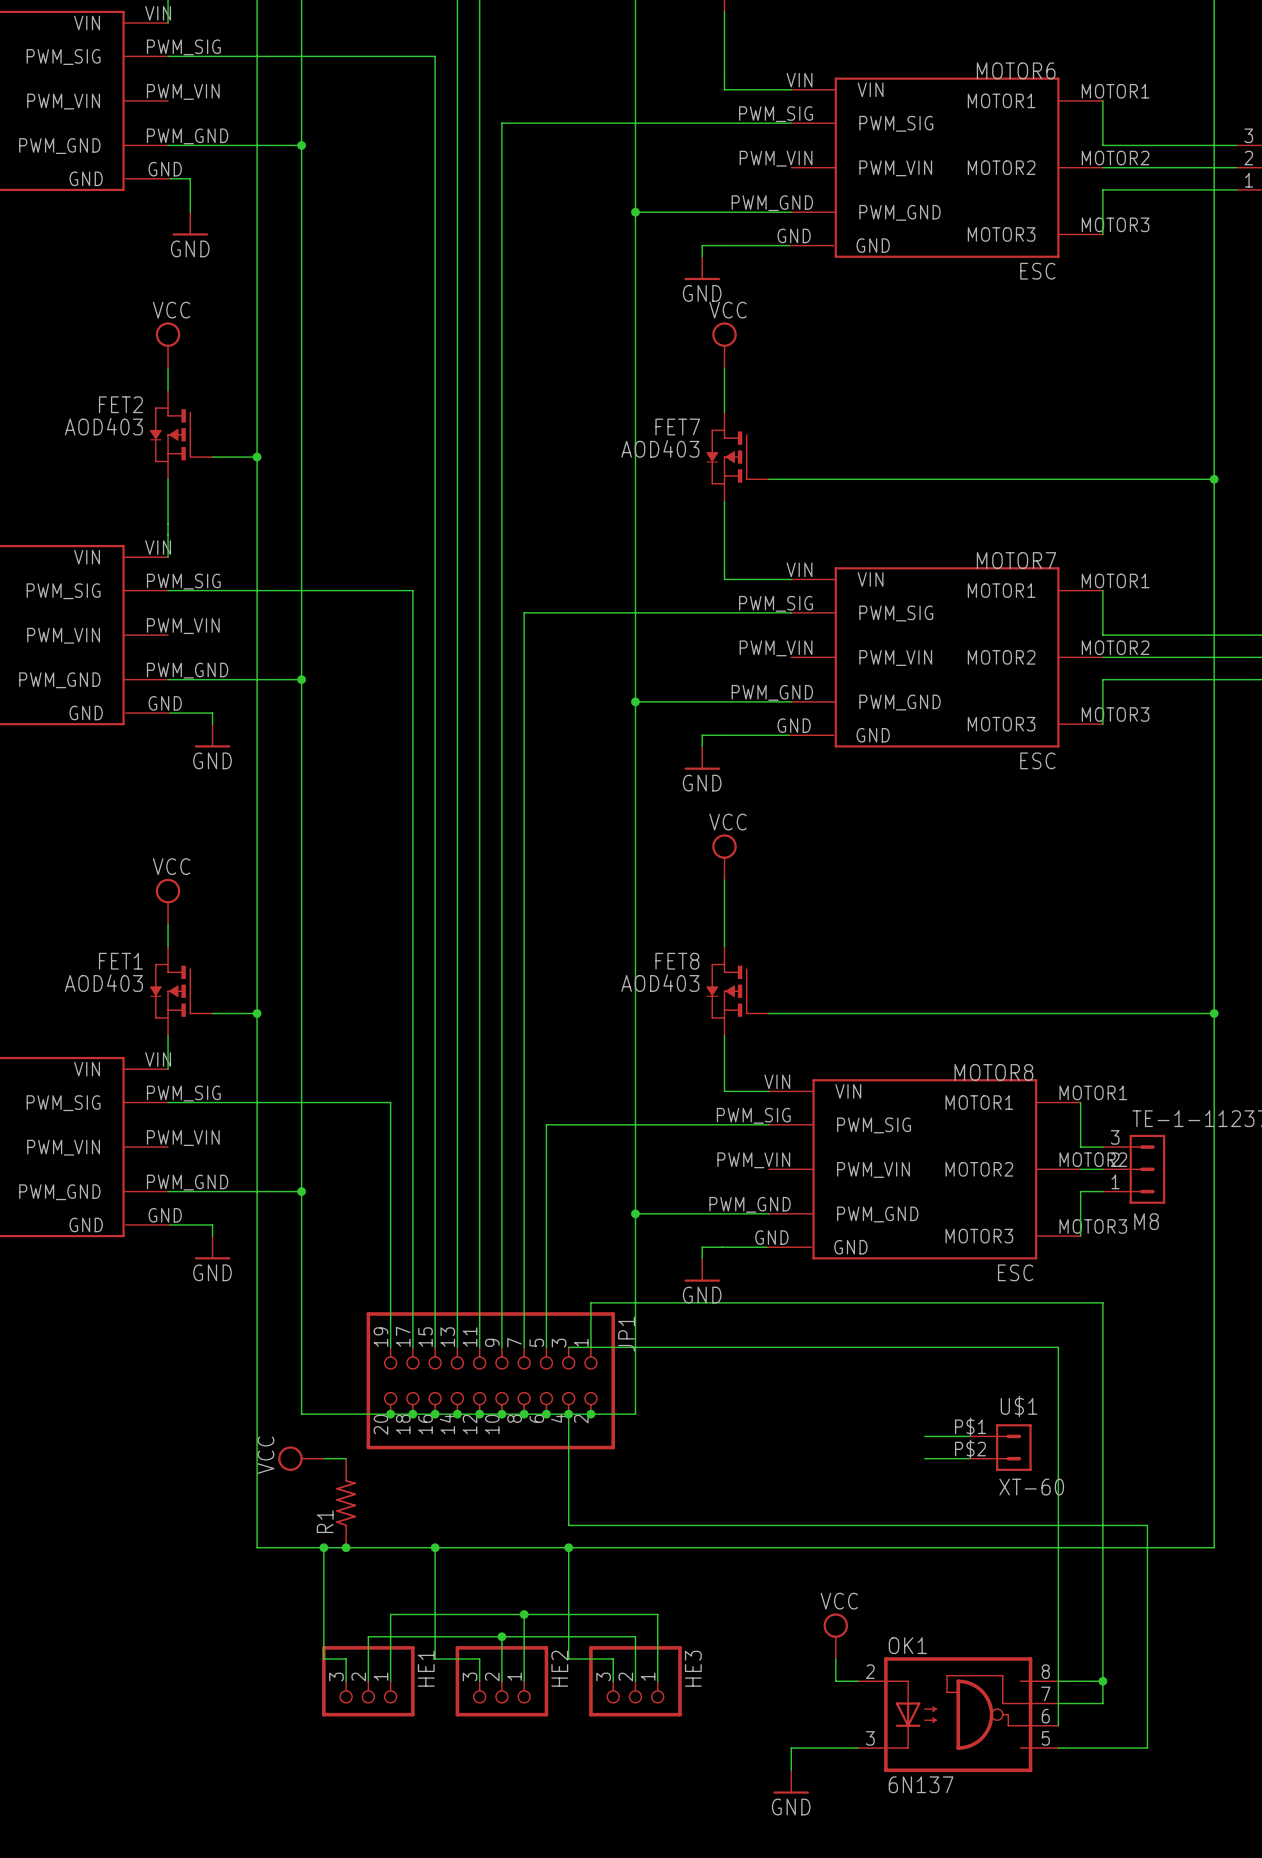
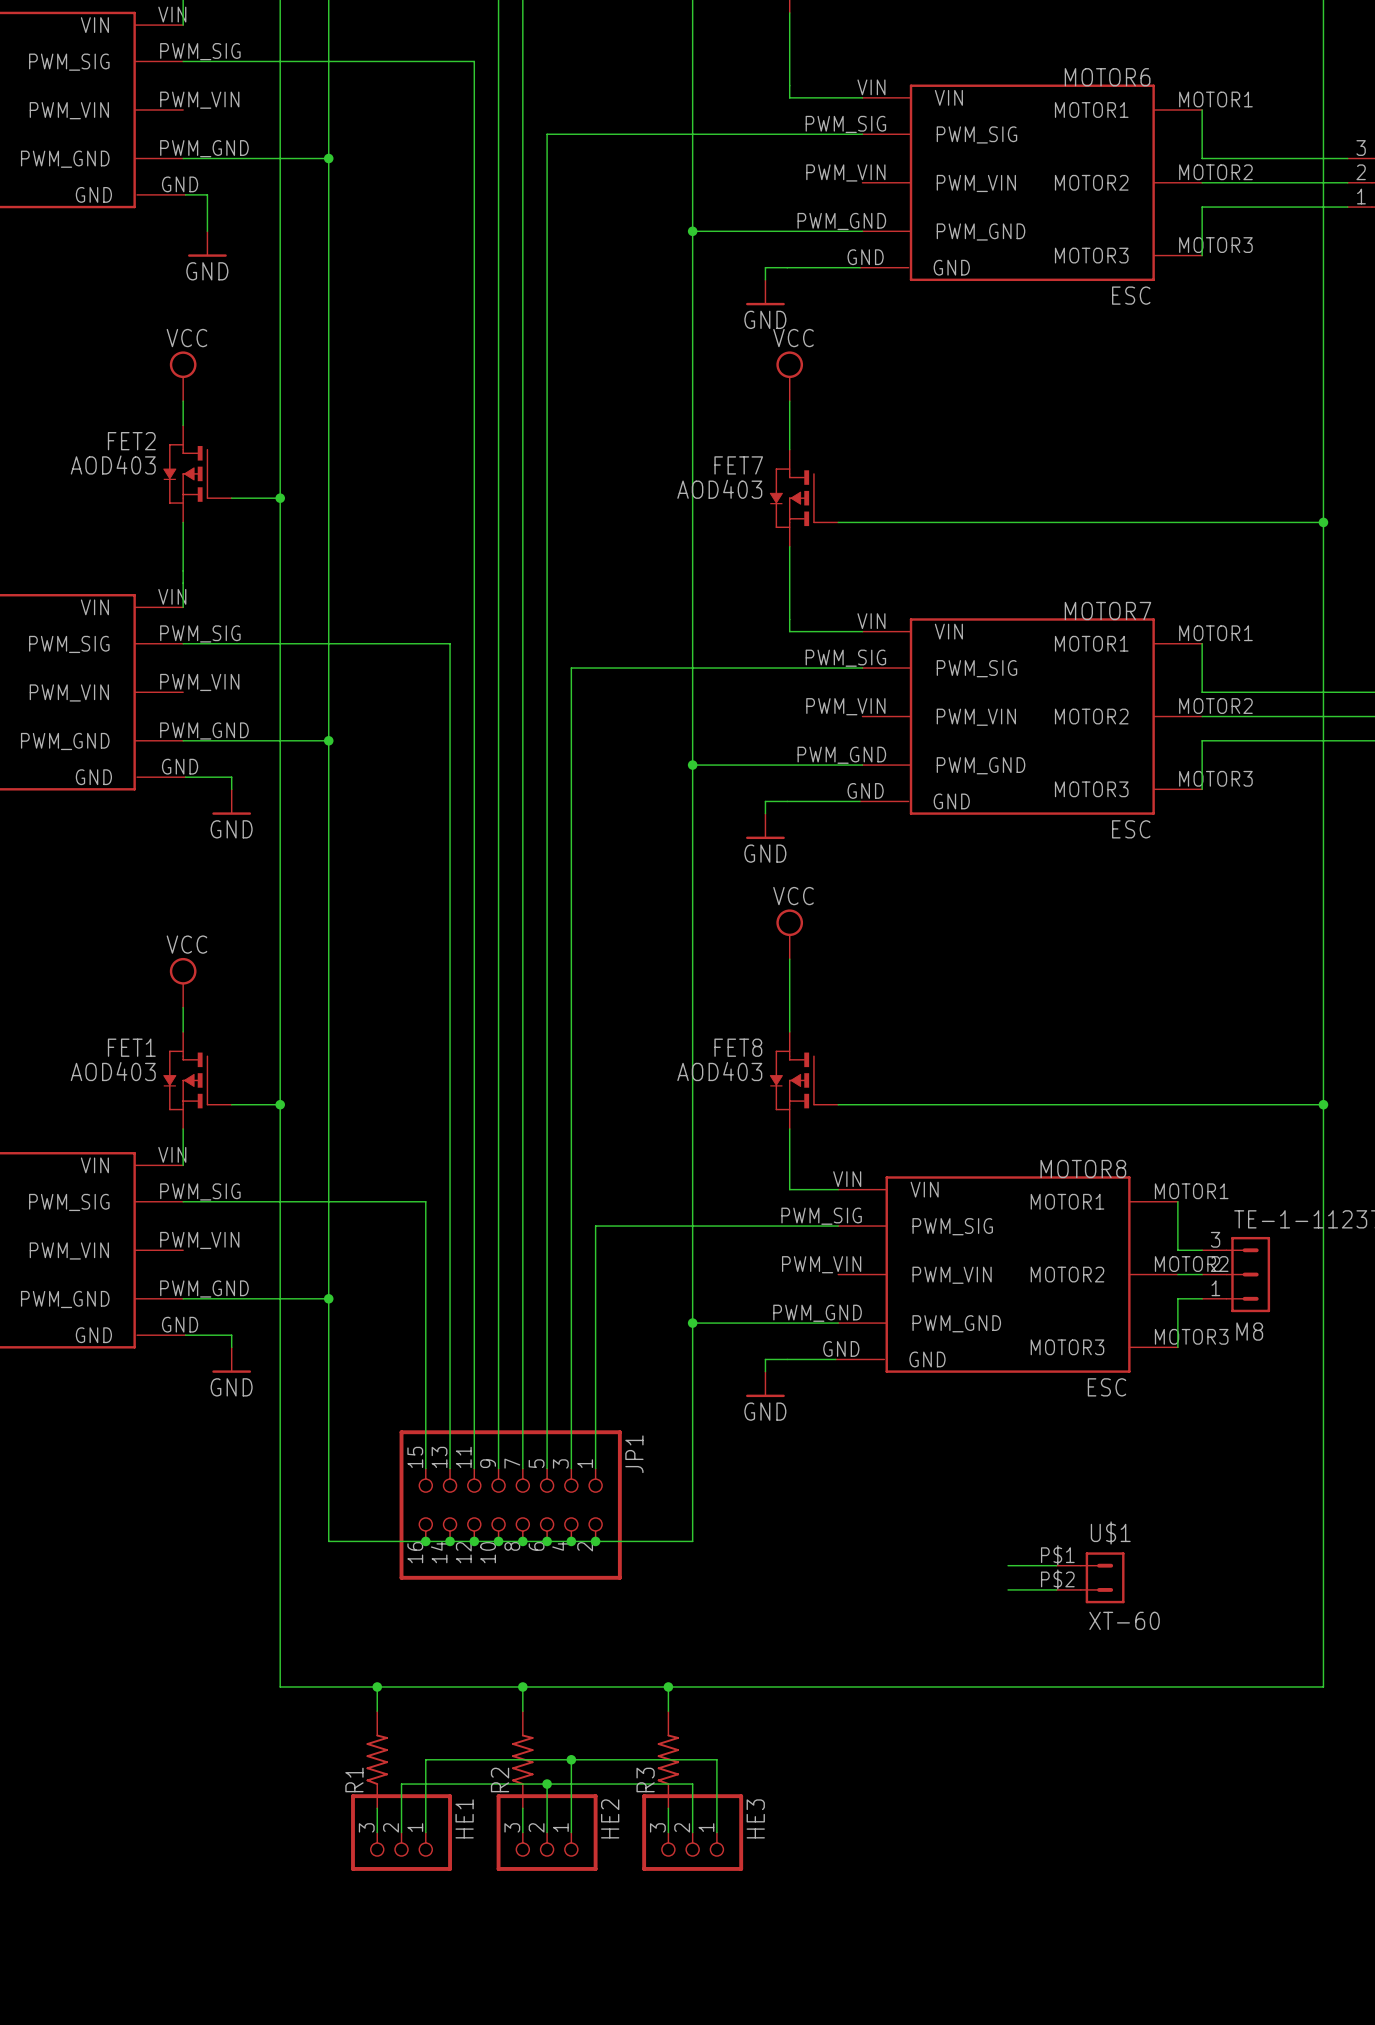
JP1 symbol: [366, 1312, 615, 1450] -> [399, 1430, 622, 1580]
JP1 name position: JP1 (626, 1334) -> JP1 (634, 1454)
wire: (568, 1347) (1058, 1347) (1058, 1725) -> none
wire: (590, 1347) (590, 1302) (1102, 1302) (1102, 1703) (1058, 1703) -> none
wire: (568, 1414) (568, 1525) (1147, 1525) (1147, 1748) (1058, 1748) -> none
junction: (568, 1414) -> none
junction: (590, 1414) -> none
power symbol: VCC (301, 1458) -> none
wire: (323, 1458) (346, 1458) -> none
R1 position: (346, 1503) -> (377, 1759)
wire: (323, 1547) (323, 1659) (346, 1659) -> none
junction: (323, 1547) -> none
wire: none -> (377, 1686) (377, 1711)
wire: (435, 1547) (435, 1659) (479, 1659) -> none
junction: (435, 1547) -> none
wire: none -> (522, 1686) (522, 1711)
junction: none -> (522, 1686)
wire: (568, 1547) (568, 1659) (613, 1659) -> none
junction: (568, 1547) -> none
wire: none -> (668, 1686) (668, 1711)
junction: none -> (668, 1686)
R2: none -> (522, 1759)
R3: none -> (668, 1759)
power symbol: VCC (835, 1636) -> none
wire: (835, 1659) (835, 1681) (858, 1681) -> none
wire: (1058, 1681) (1102, 1681) -> none
junction: (1102, 1681) -> none
OK1: 6N137 (958, 1714) -> none
wire: (858, 1748) (791, 1748) (791, 1770) -> none
power symbol: GND (791, 1781) -> none

